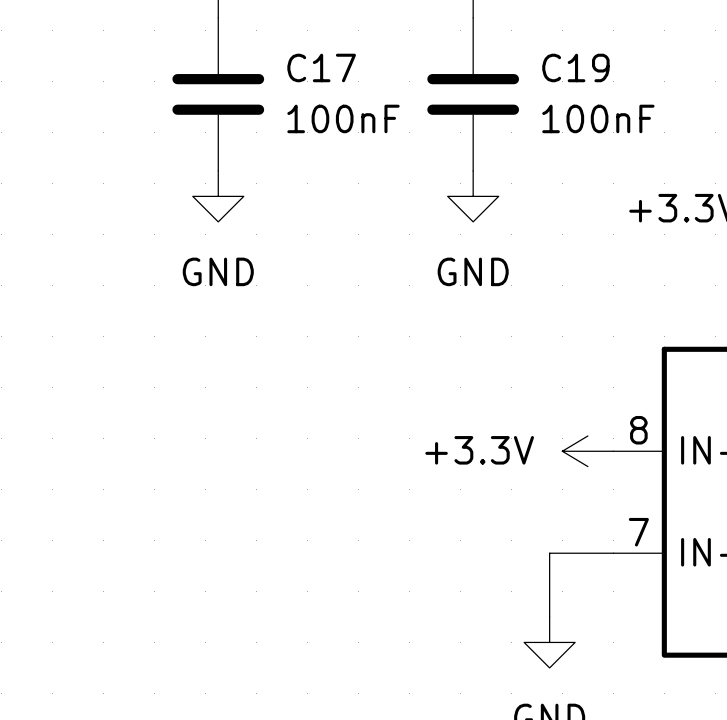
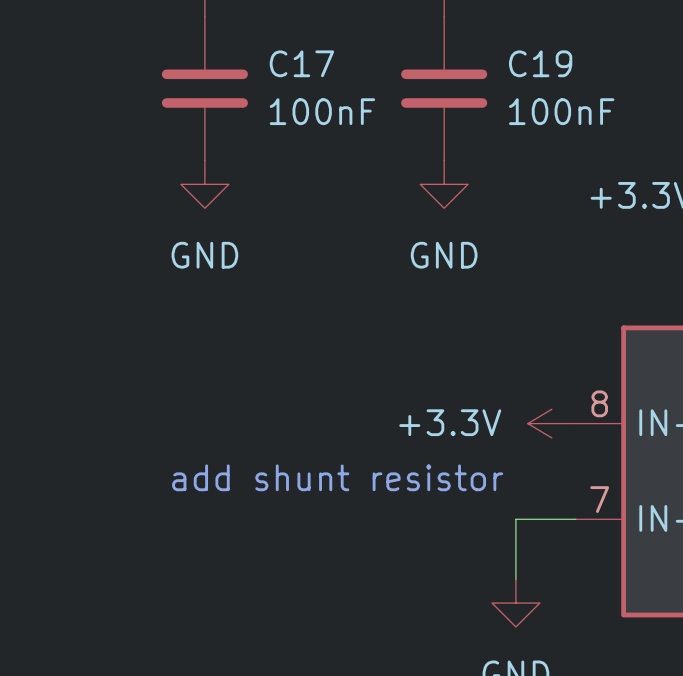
text: none -> add shunt resistor (337, 477)

